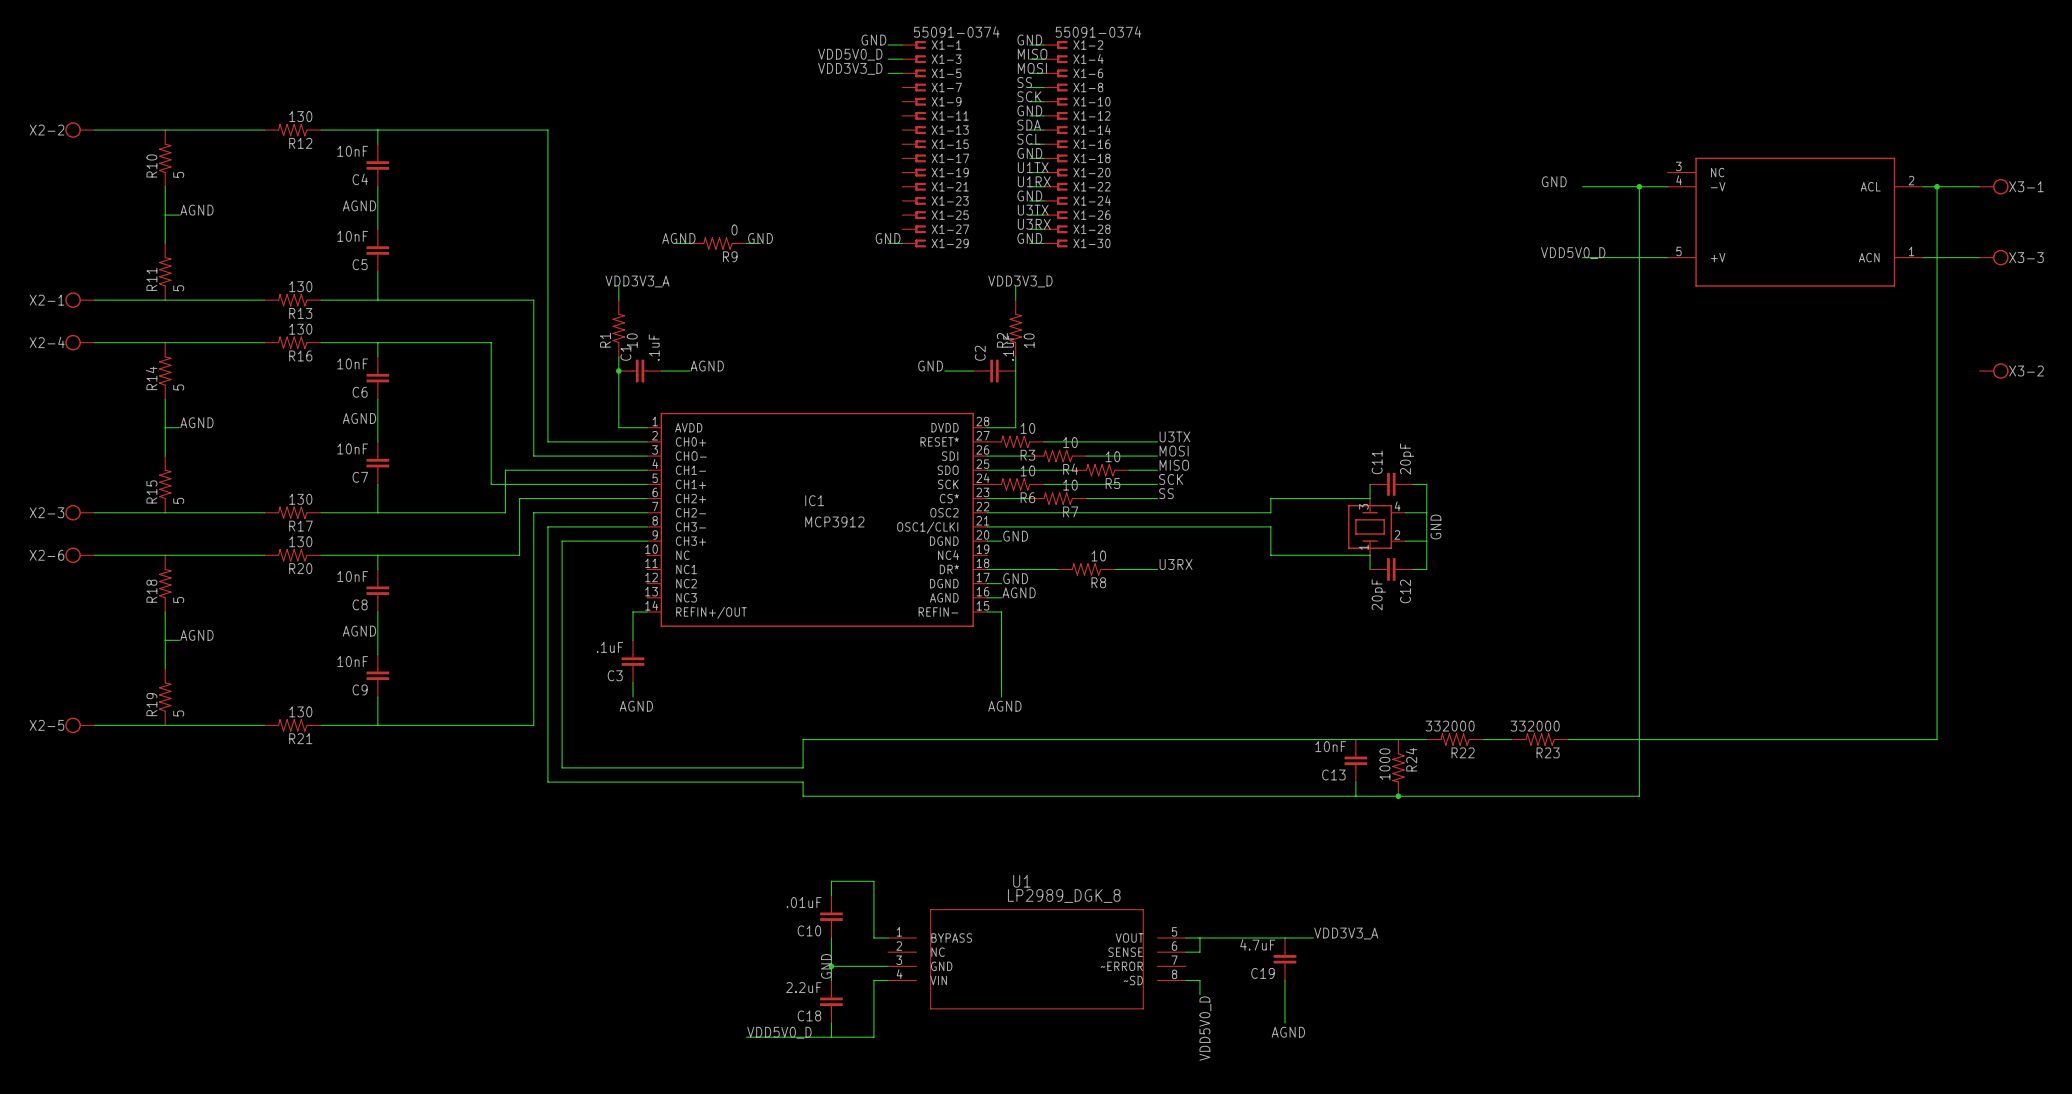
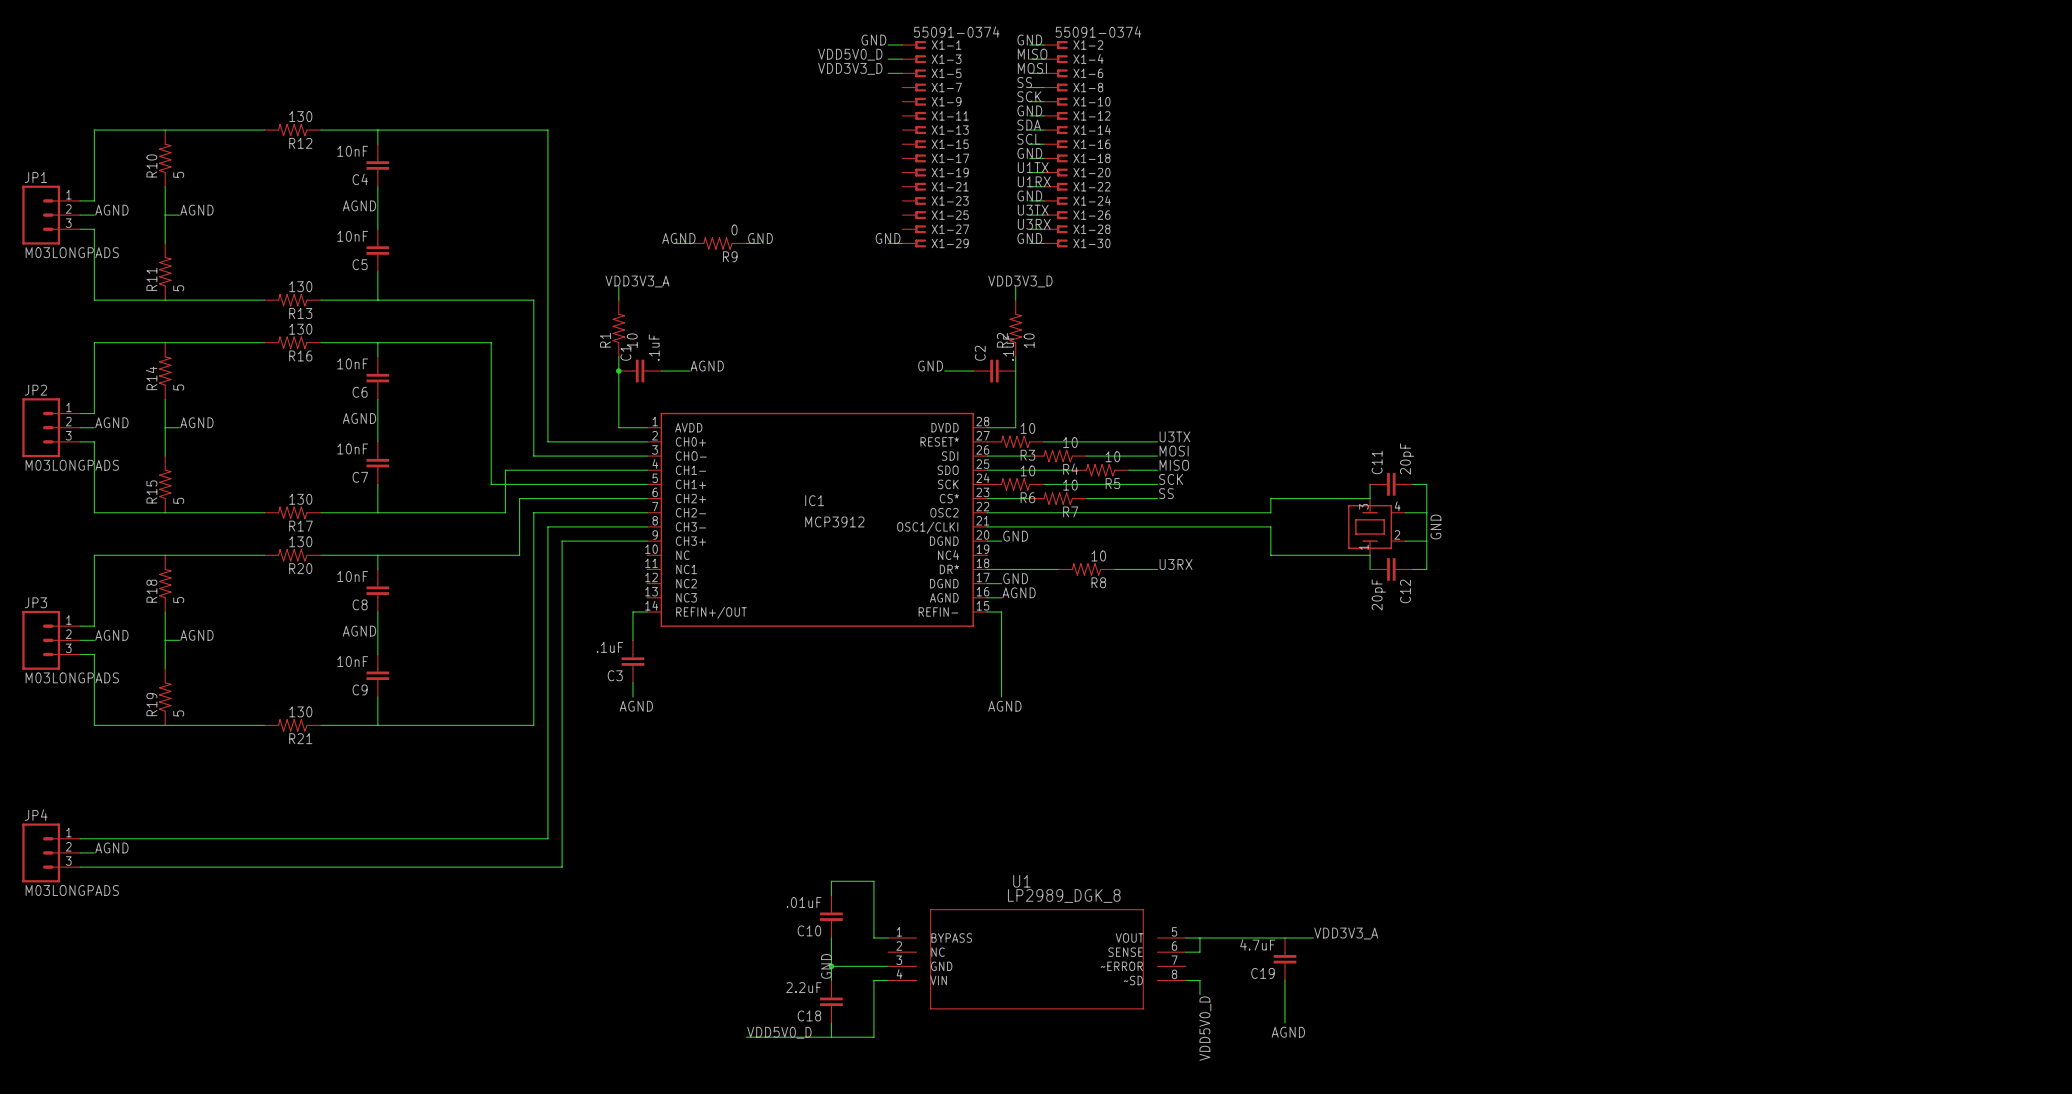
X2-2: (79, 130) -> none
wire: none -> (94, 130) (94, 200) (80, 200)
label: GND (1554, 181) -> none
wire: (1582, 186) (1667, 186) -> none
wire: (1639, 186) (1639, 796) (803, 796) (803, 782) (547, 782) -> (80, 838) (547, 838) (547, 782)
junction: (1639, 186) -> none
wire: (1922, 186) (1979, 186) -> none
wire: (1937, 186) (1937, 739) (1568, 739) -> none
junction: (1937, 186) -> none
X3-1: (1994, 186) -> none
label: none -> AGND (111, 210)
JP1: none -> M03LONGPADS (51, 215)
wire: none -> (80, 215) (94, 215)
part: (1795, 222) -> none
wire: none -> (80, 229) (94, 229) (94, 300)
label: VDD5V0_D (1573, 253) -> none
wire: (1582, 257) (1667, 257) -> none
wire: (1922, 257) (1979, 257) -> none
X3-3: (1994, 257) -> none
X2-1: (79, 300) -> none
X2-4: (79, 342) -> none
wire: none -> (94, 342) (94, 413) (80, 413)
X3-2: (1994, 371) -> none
label: none -> AGND (111, 422)
JP2: none -> M03LONGPADS (51, 427)
wire: none -> (80, 427) (94, 427)
wire: none -> (80, 441) (94, 441) (94, 512)
X2-3: (79, 512) -> none
X2-6: (79, 555) -> none
wire: none -> (94, 555) (94, 626) (80, 626)
label: none -> AGND (111, 635)
JP3: none -> M03LONGPADS (51, 640)
wire: none -> (80, 640) (94, 640)
wire: none -> (80, 654) (94, 654) (94, 725)
X2-5: (79, 725) -> none
wire: (1426, 739) (803, 739) (803, 767) (562, 767) -> (80, 867) (562, 867) (562, 767)
R22: 332000 (1455, 739) -> none
wire: (1483, 739) (1511, 739) -> none
R23: 332000 (1540, 739) -> none
C13: 10nF (1355, 760) -> none
R24: 1000 (1398, 767) -> none
wire: (1355, 782) (1355, 796) -> none
junction: (1398, 796) -> none
label: none -> AGND (111, 847)
JP4: none -> M03LONGPADS (51, 852)
wire: none -> (80, 852) (94, 852)

